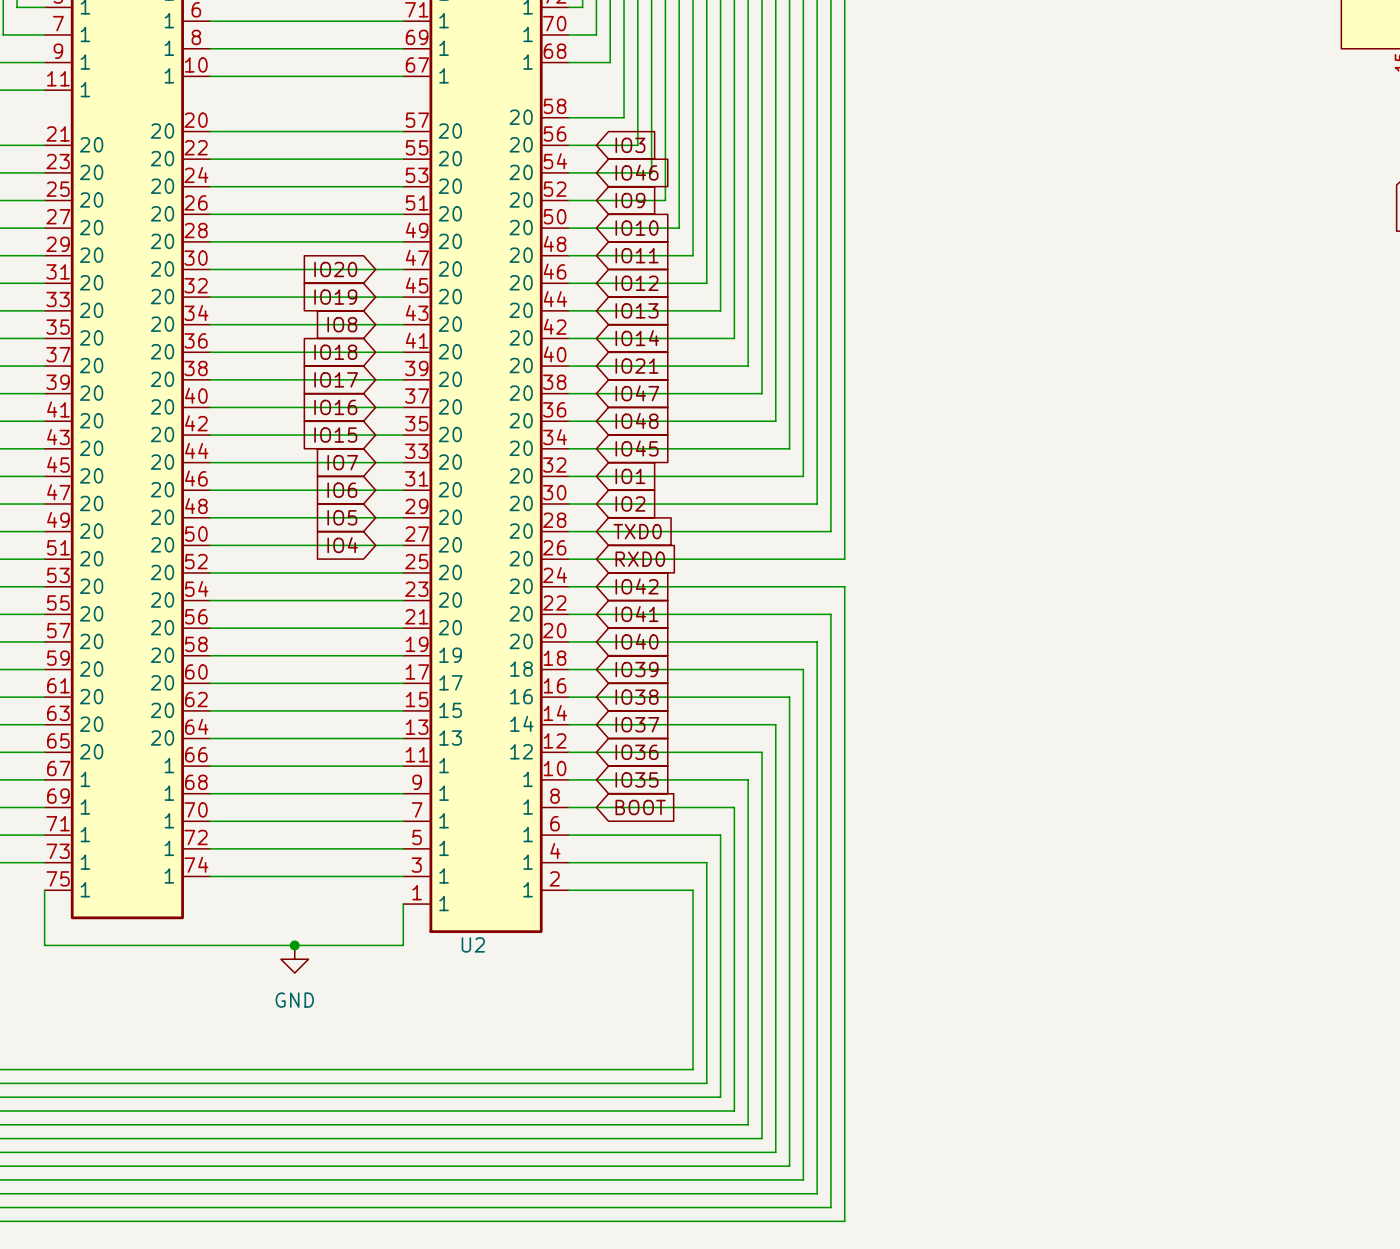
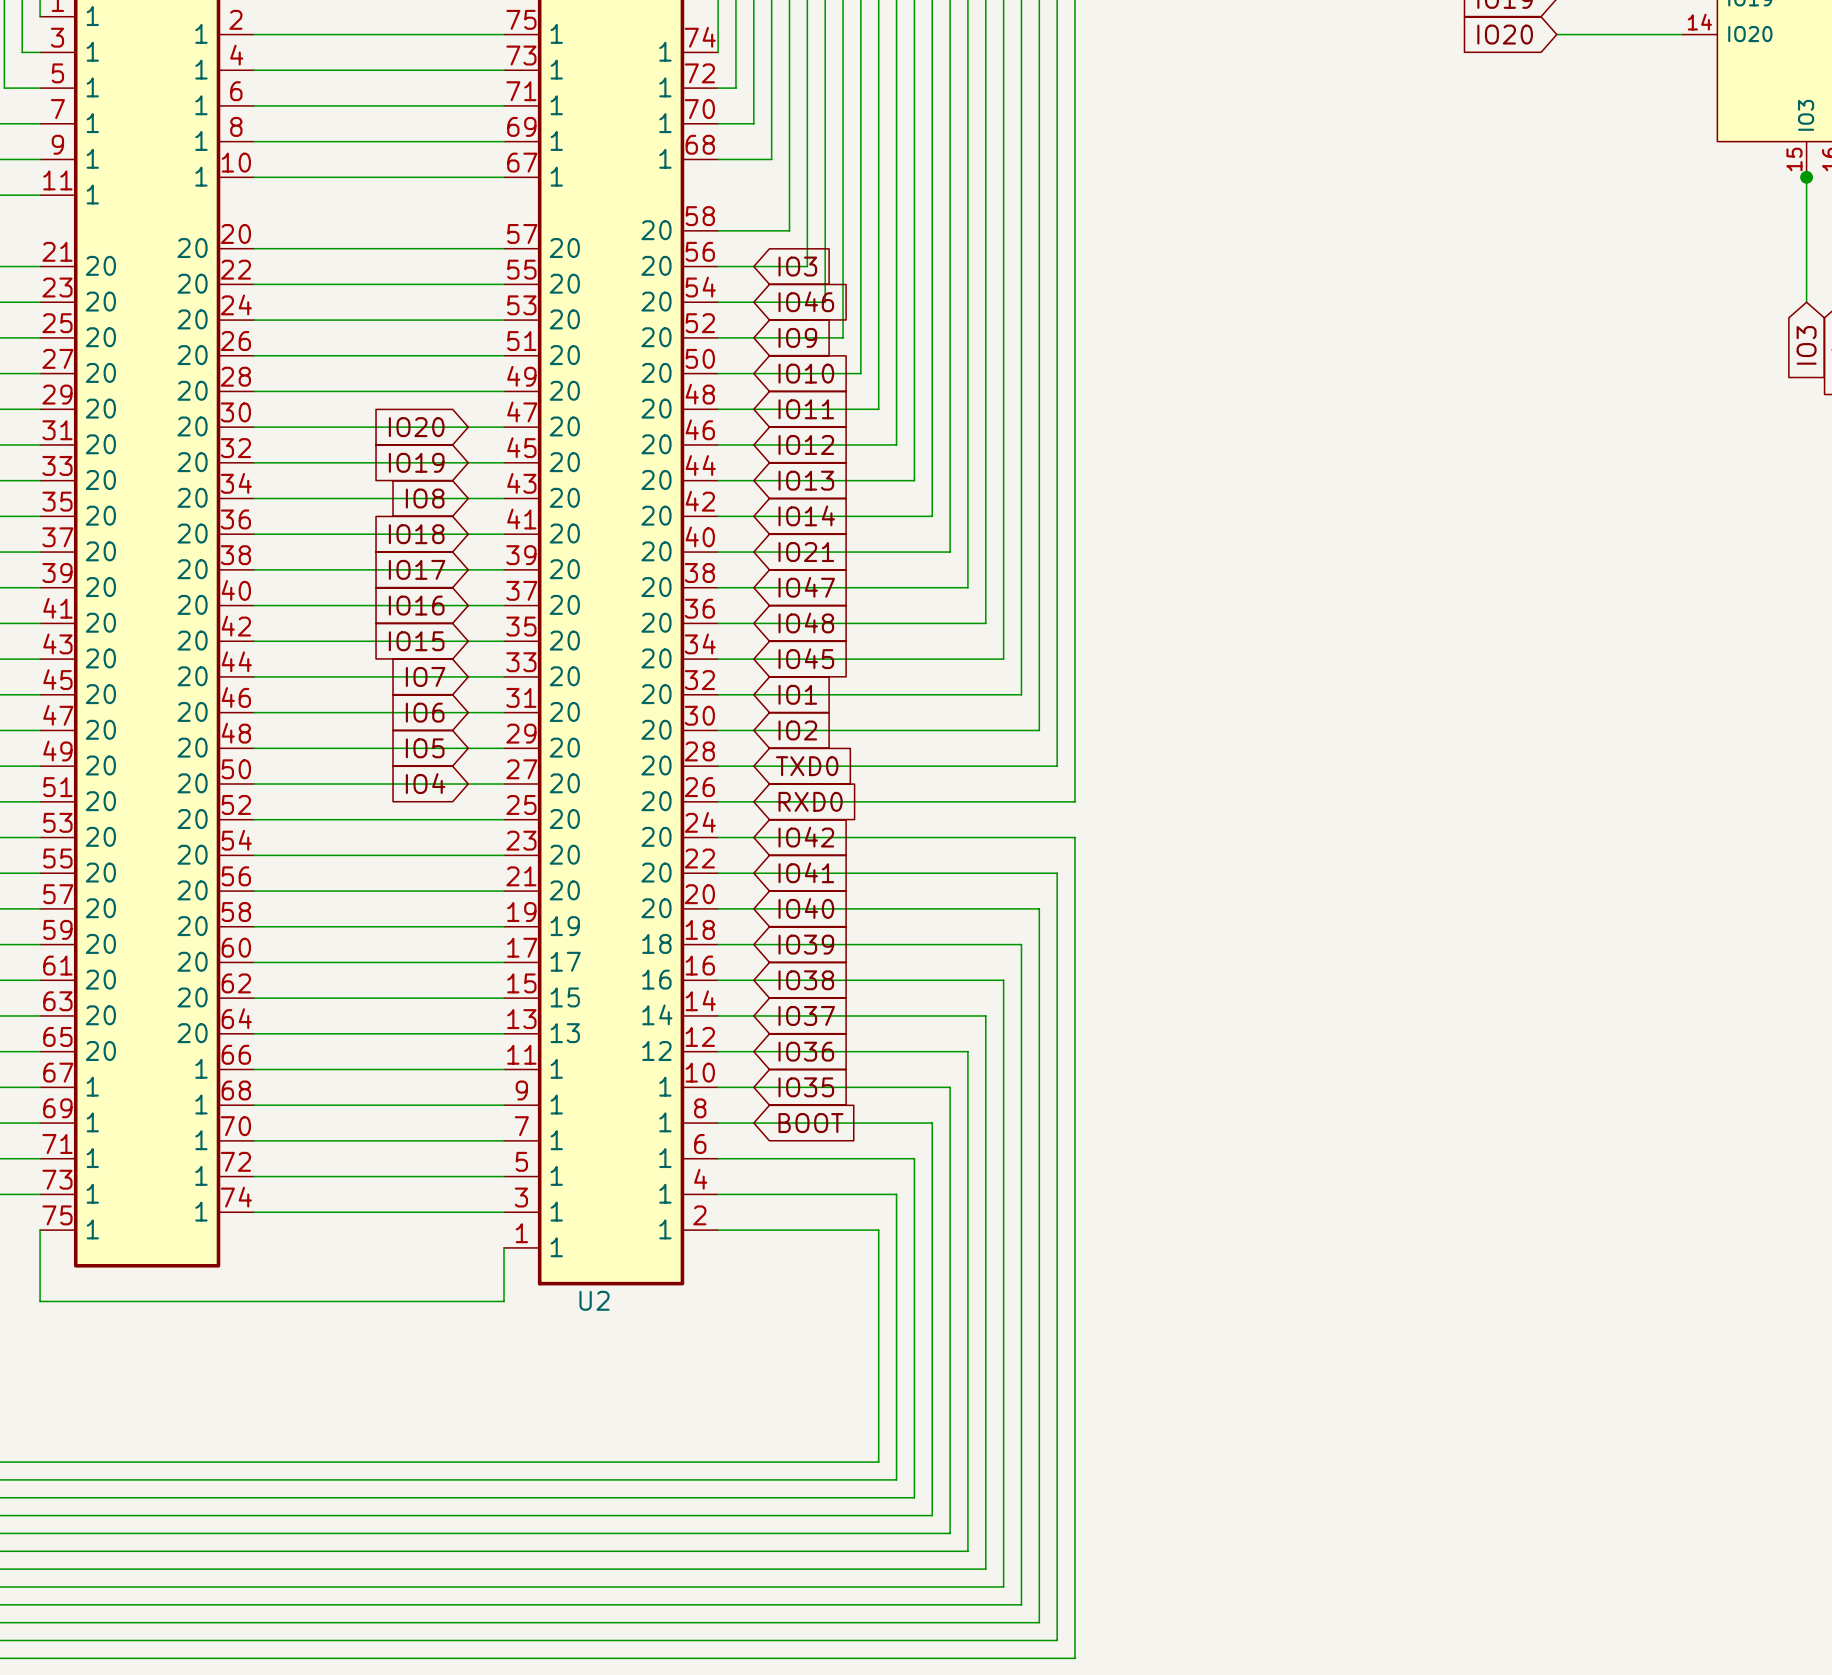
junction: (294, 945) -> none
power symbol: GND (294, 959) -> none

